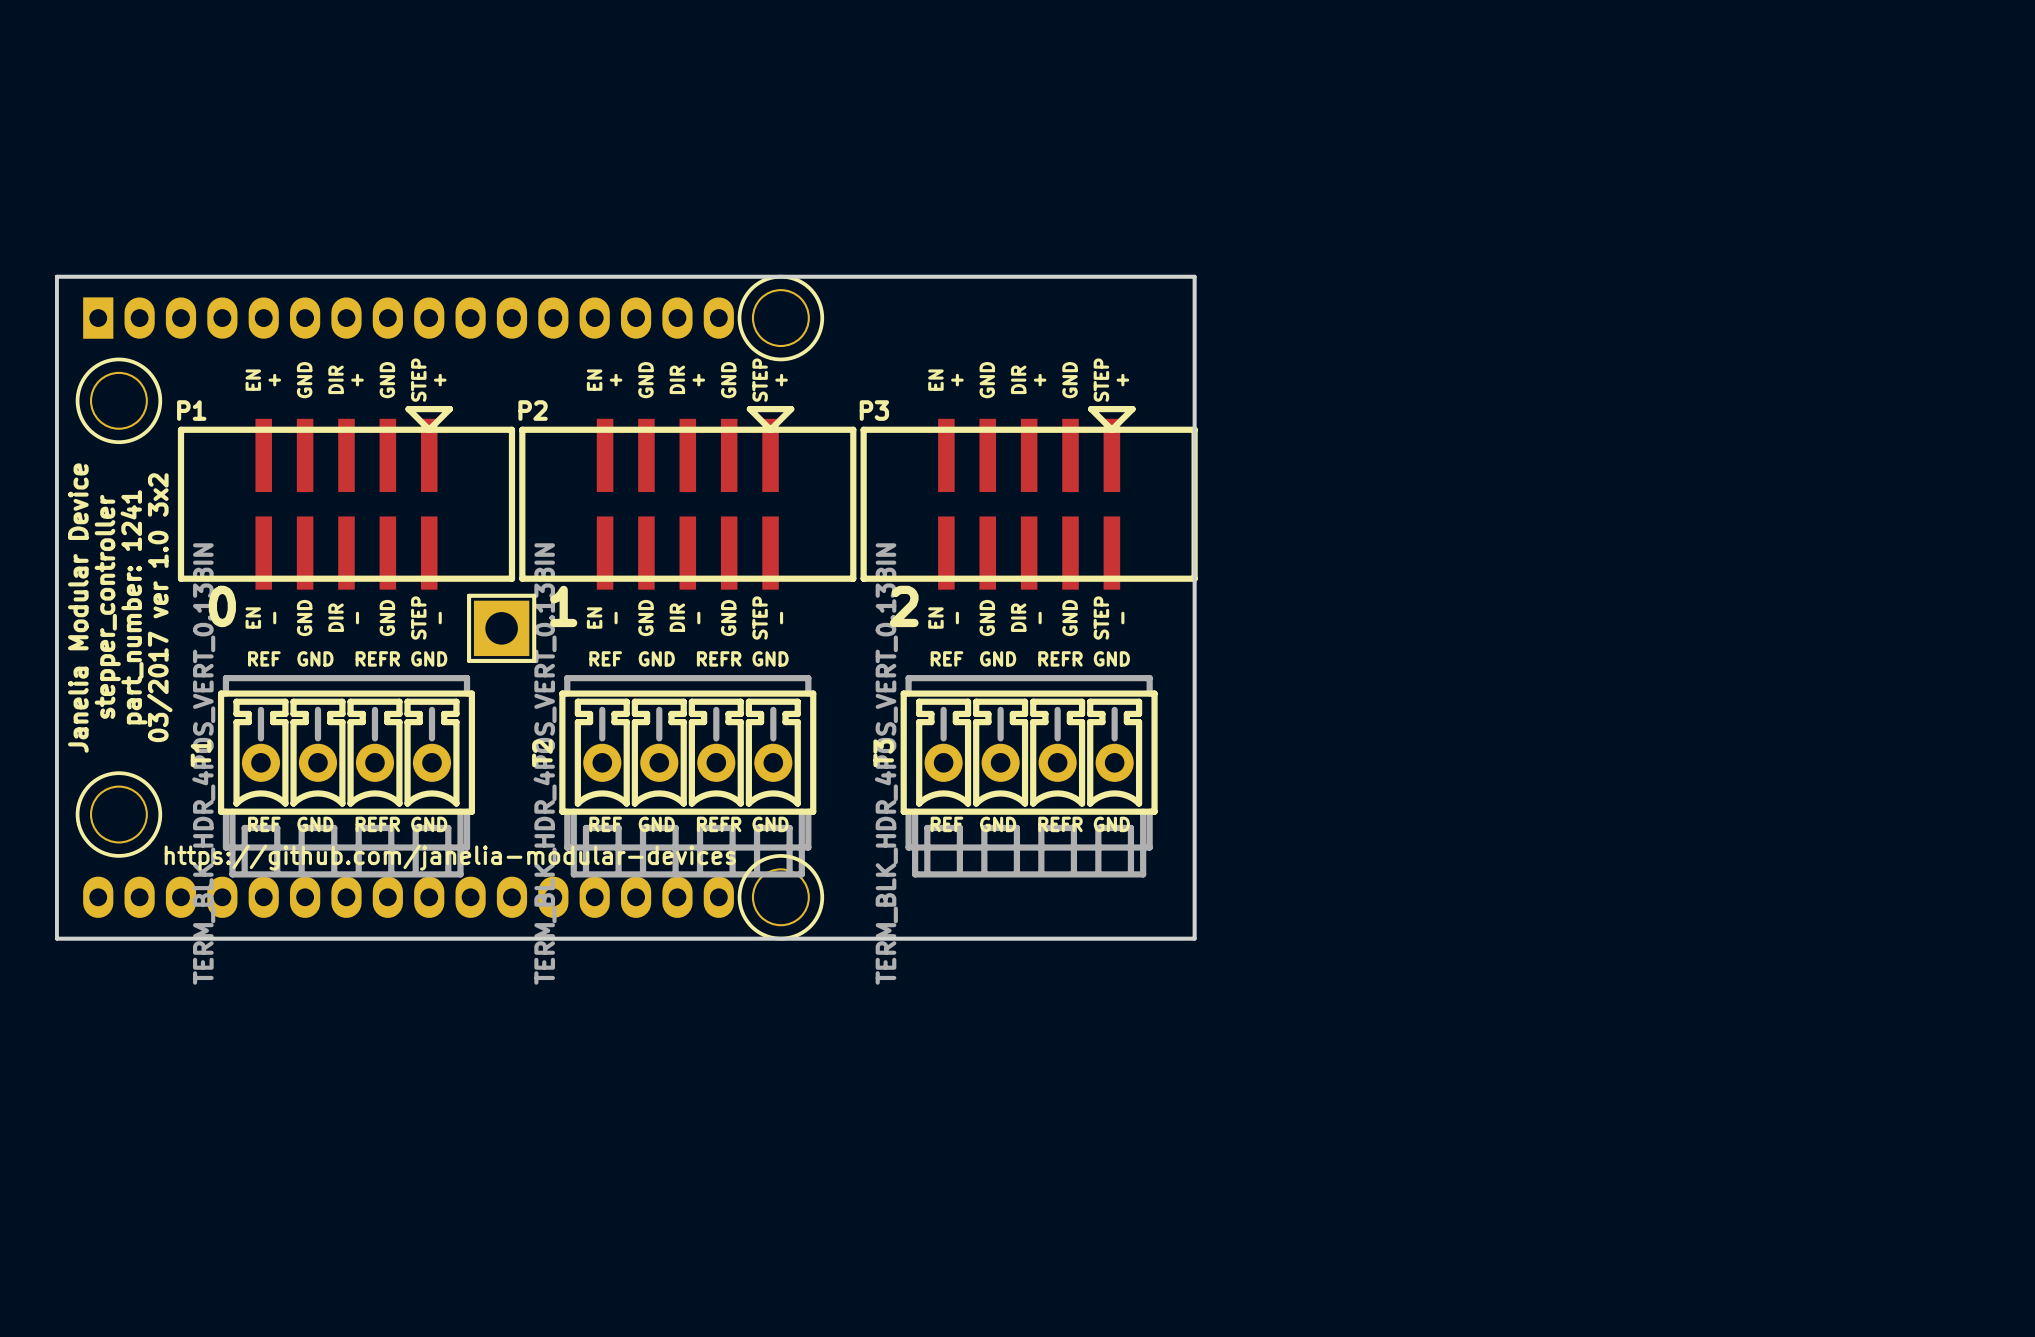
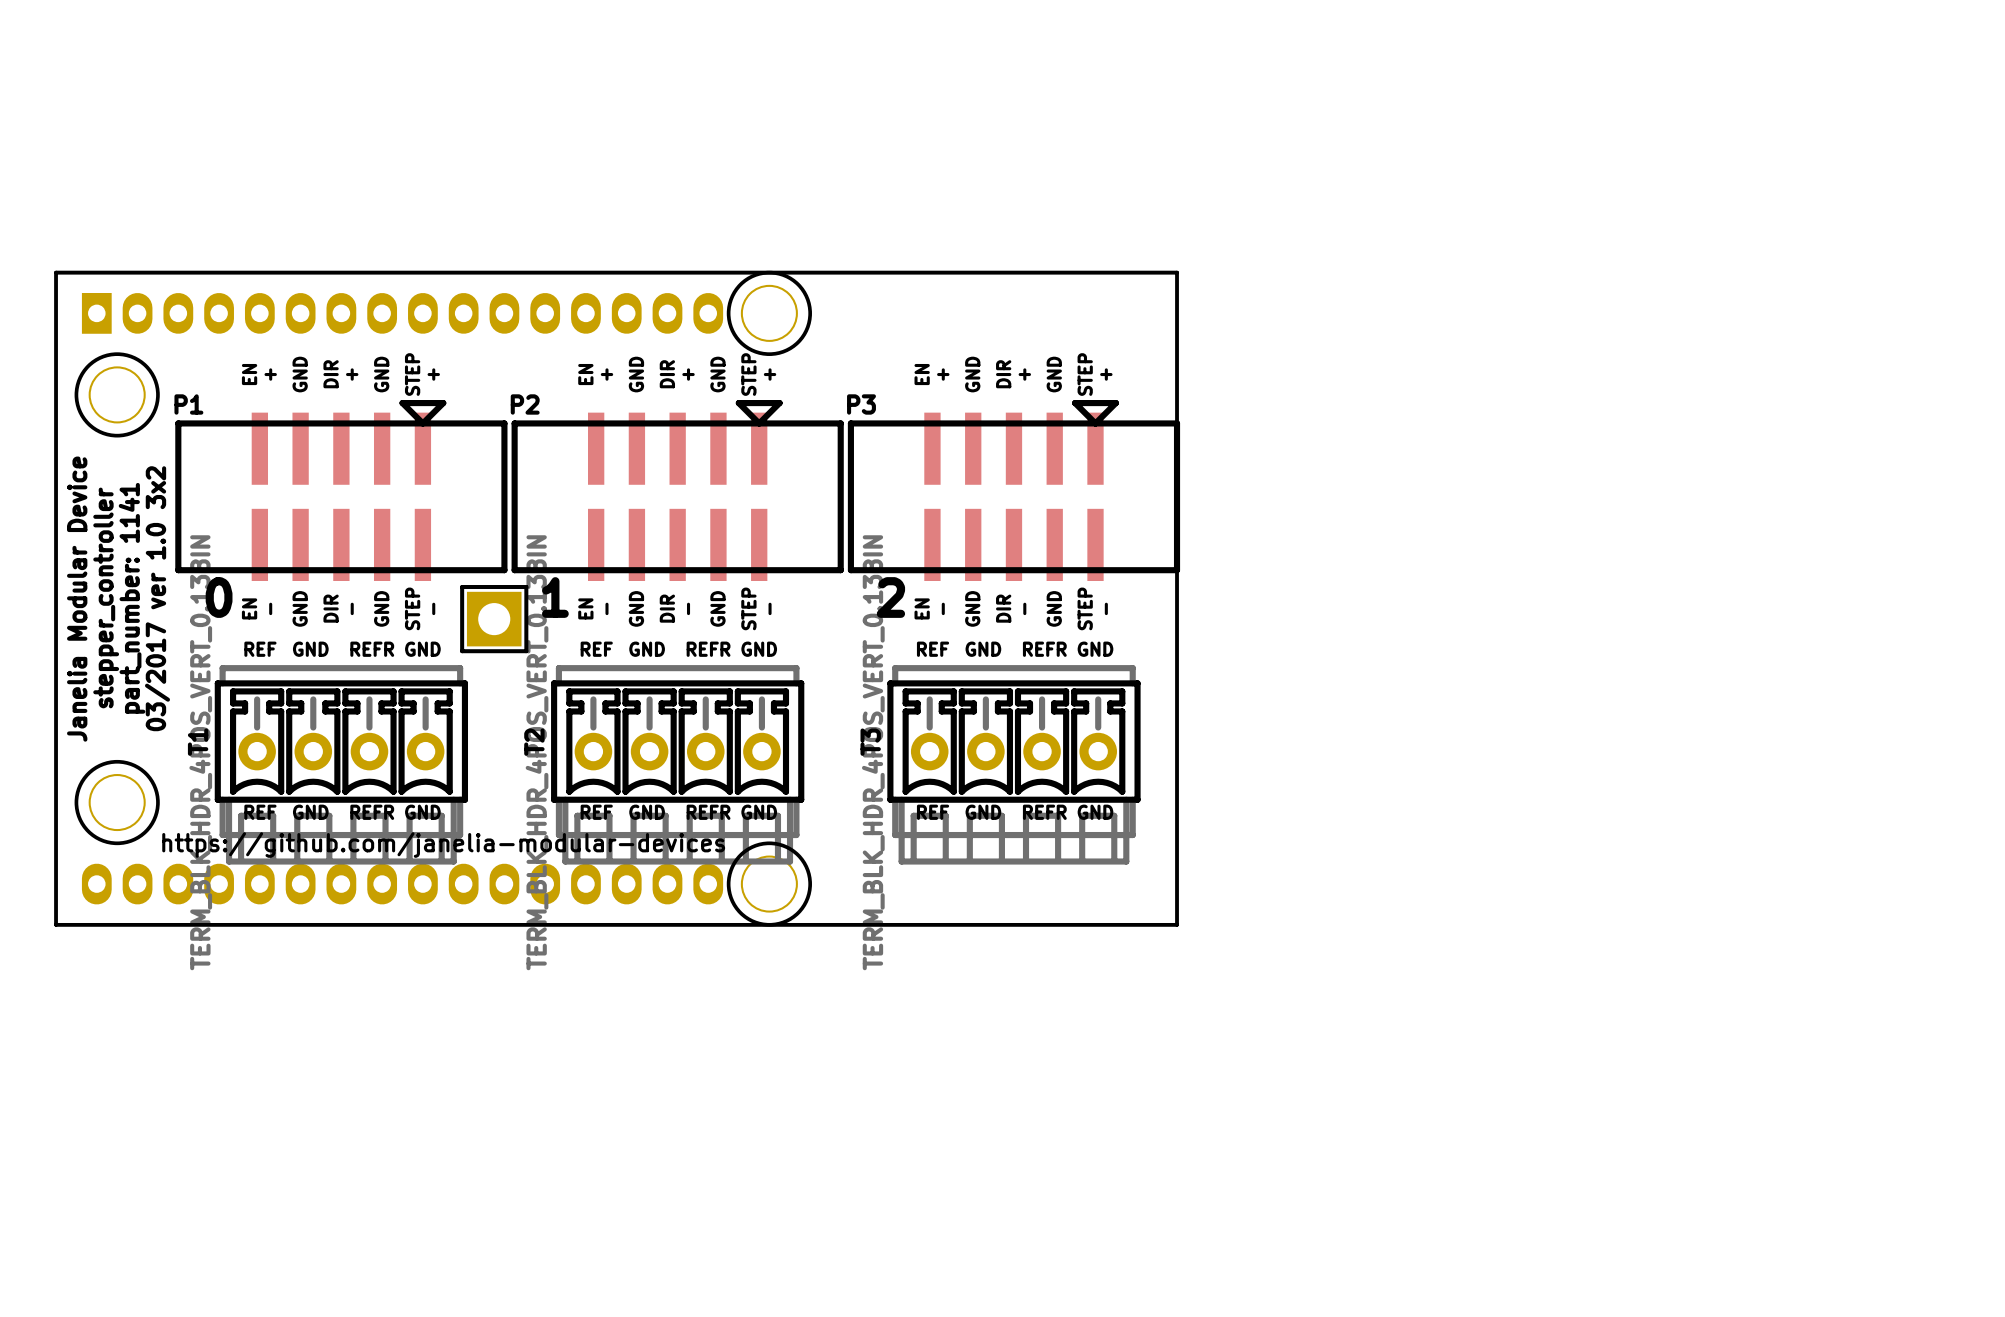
text: part_number: 1241 (134, 607) -> part_number: 1141 (132, 598)

